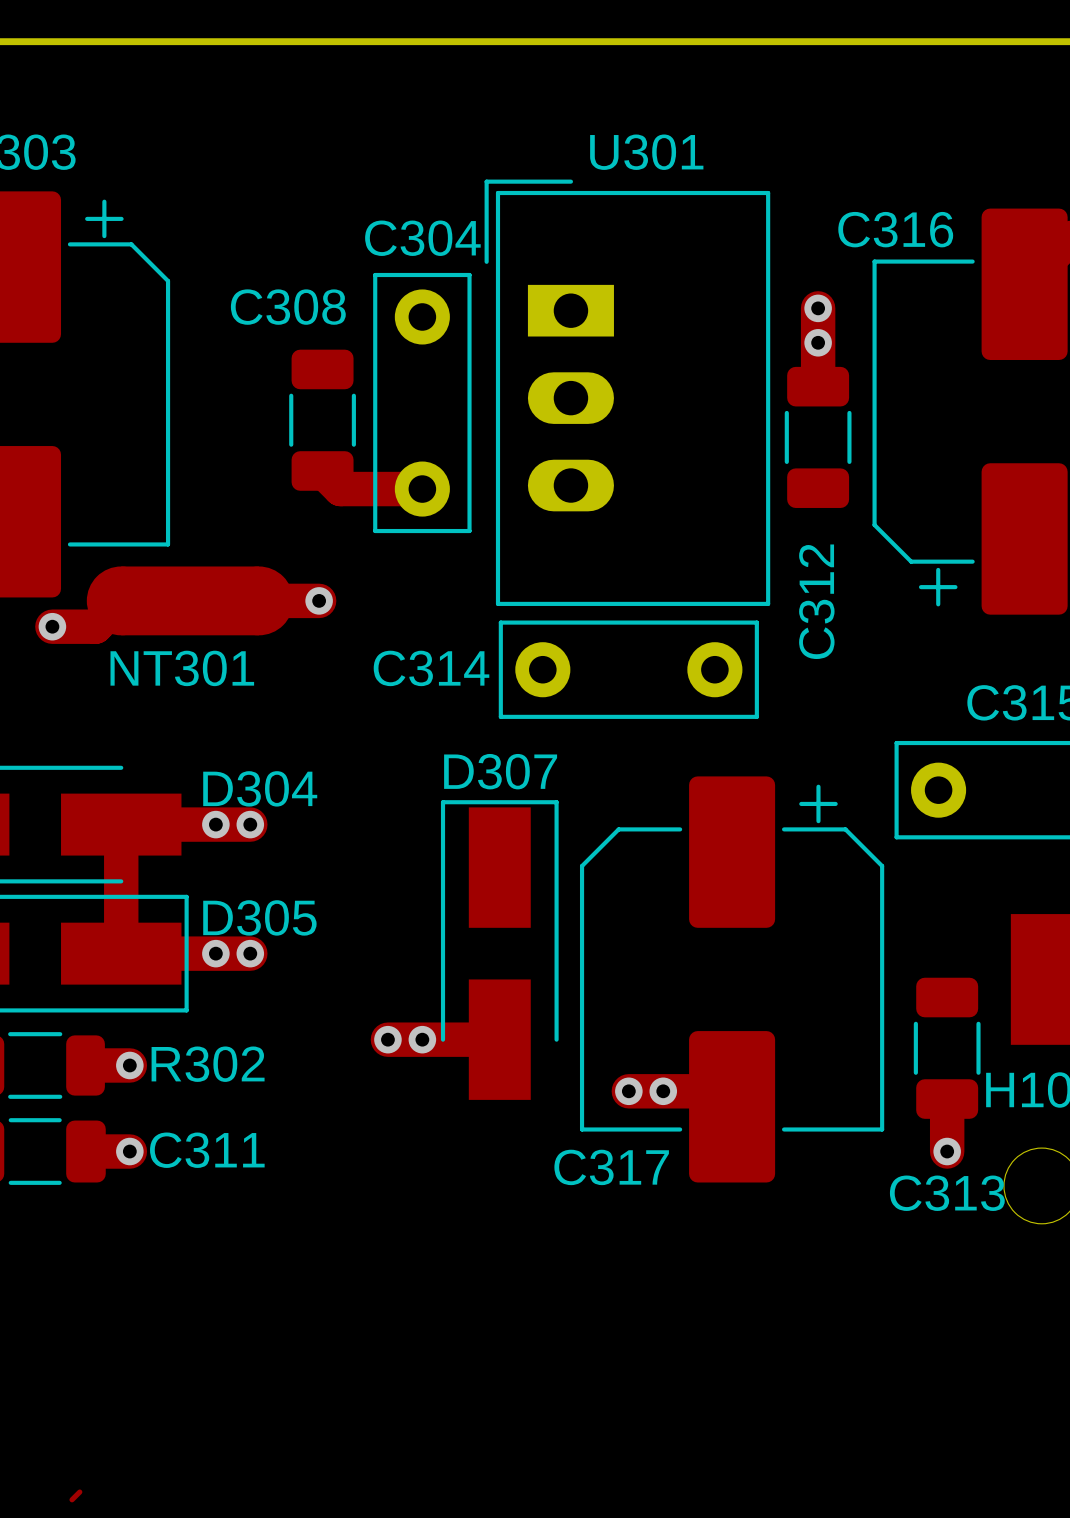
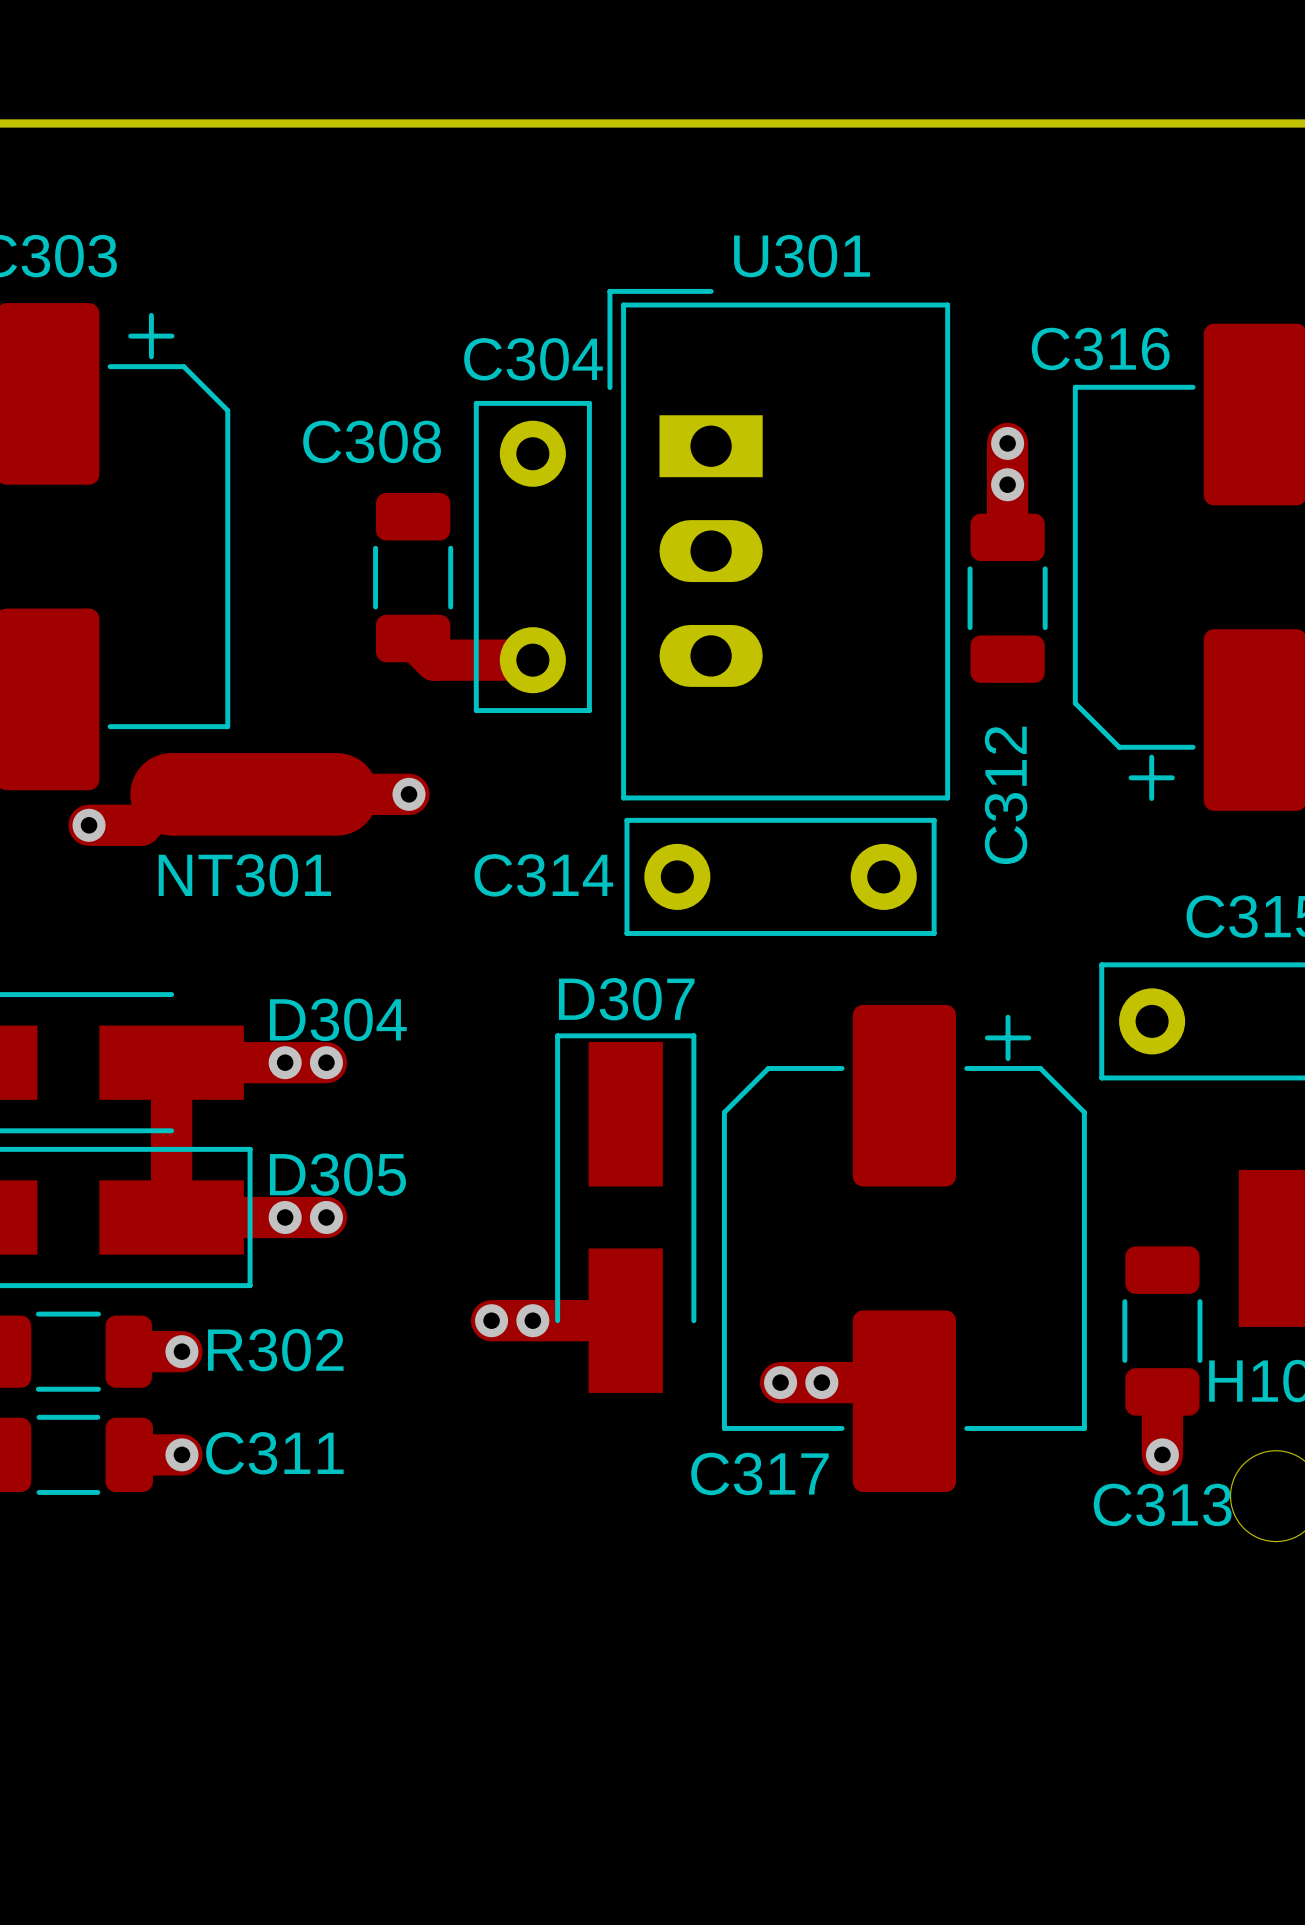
track: (79, 1492) (72, 1499) -> none

